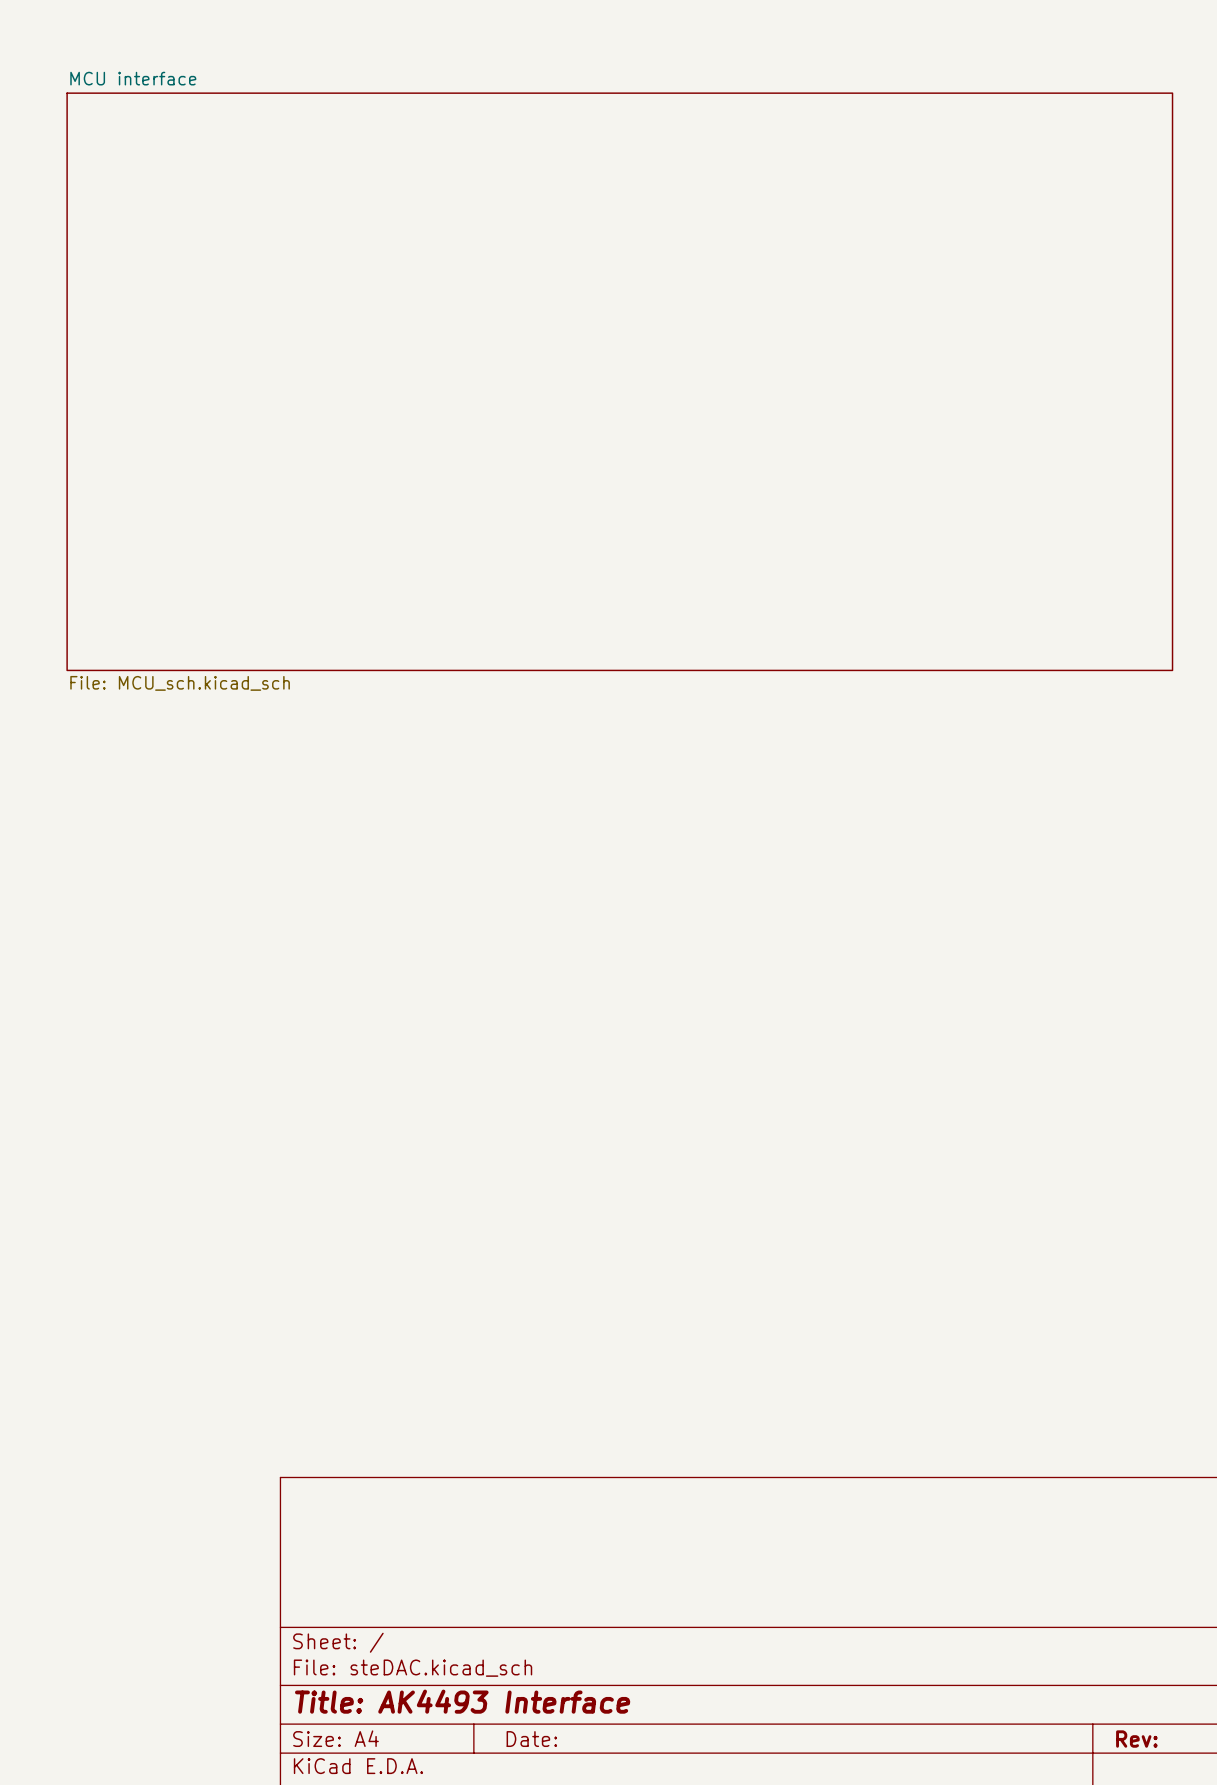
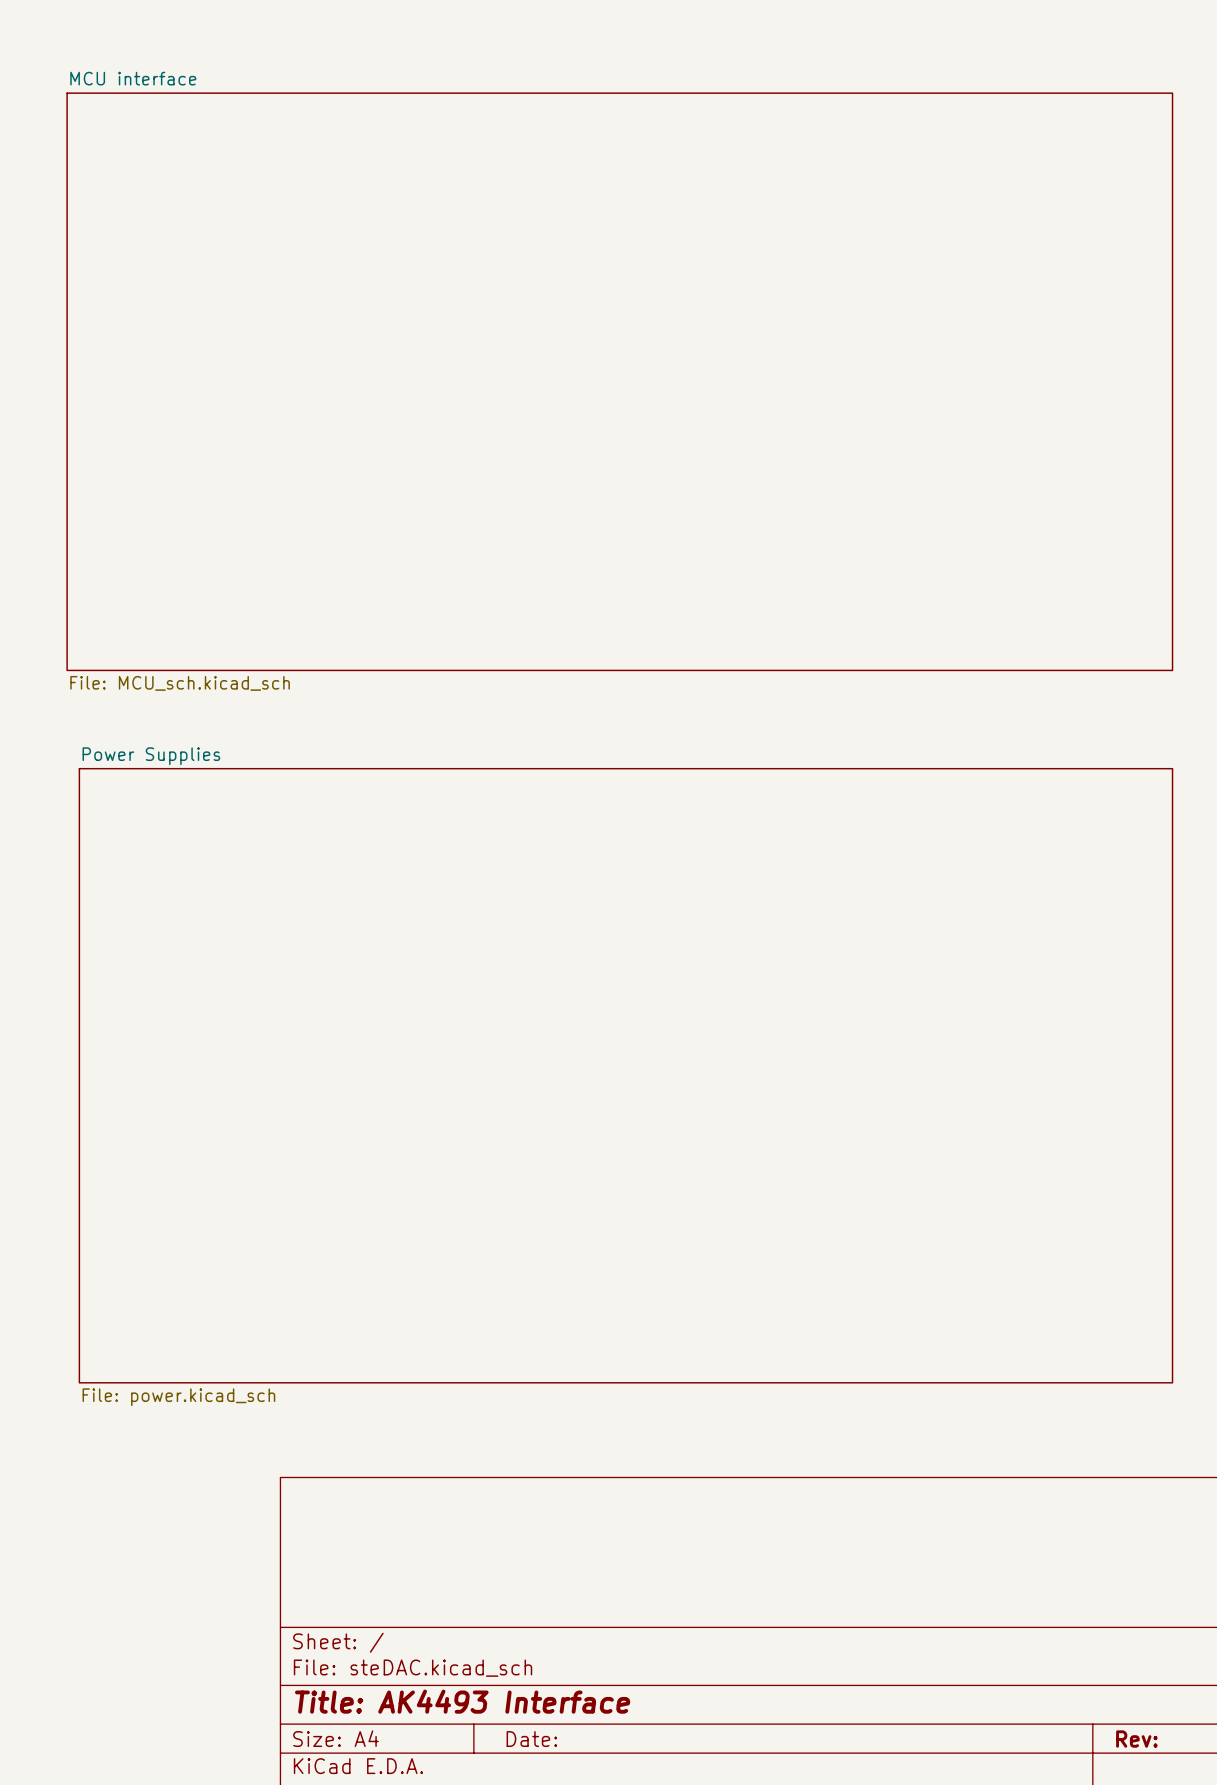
sheet Power Supplies: none -> File: power.kicad_sch (625, 1075)

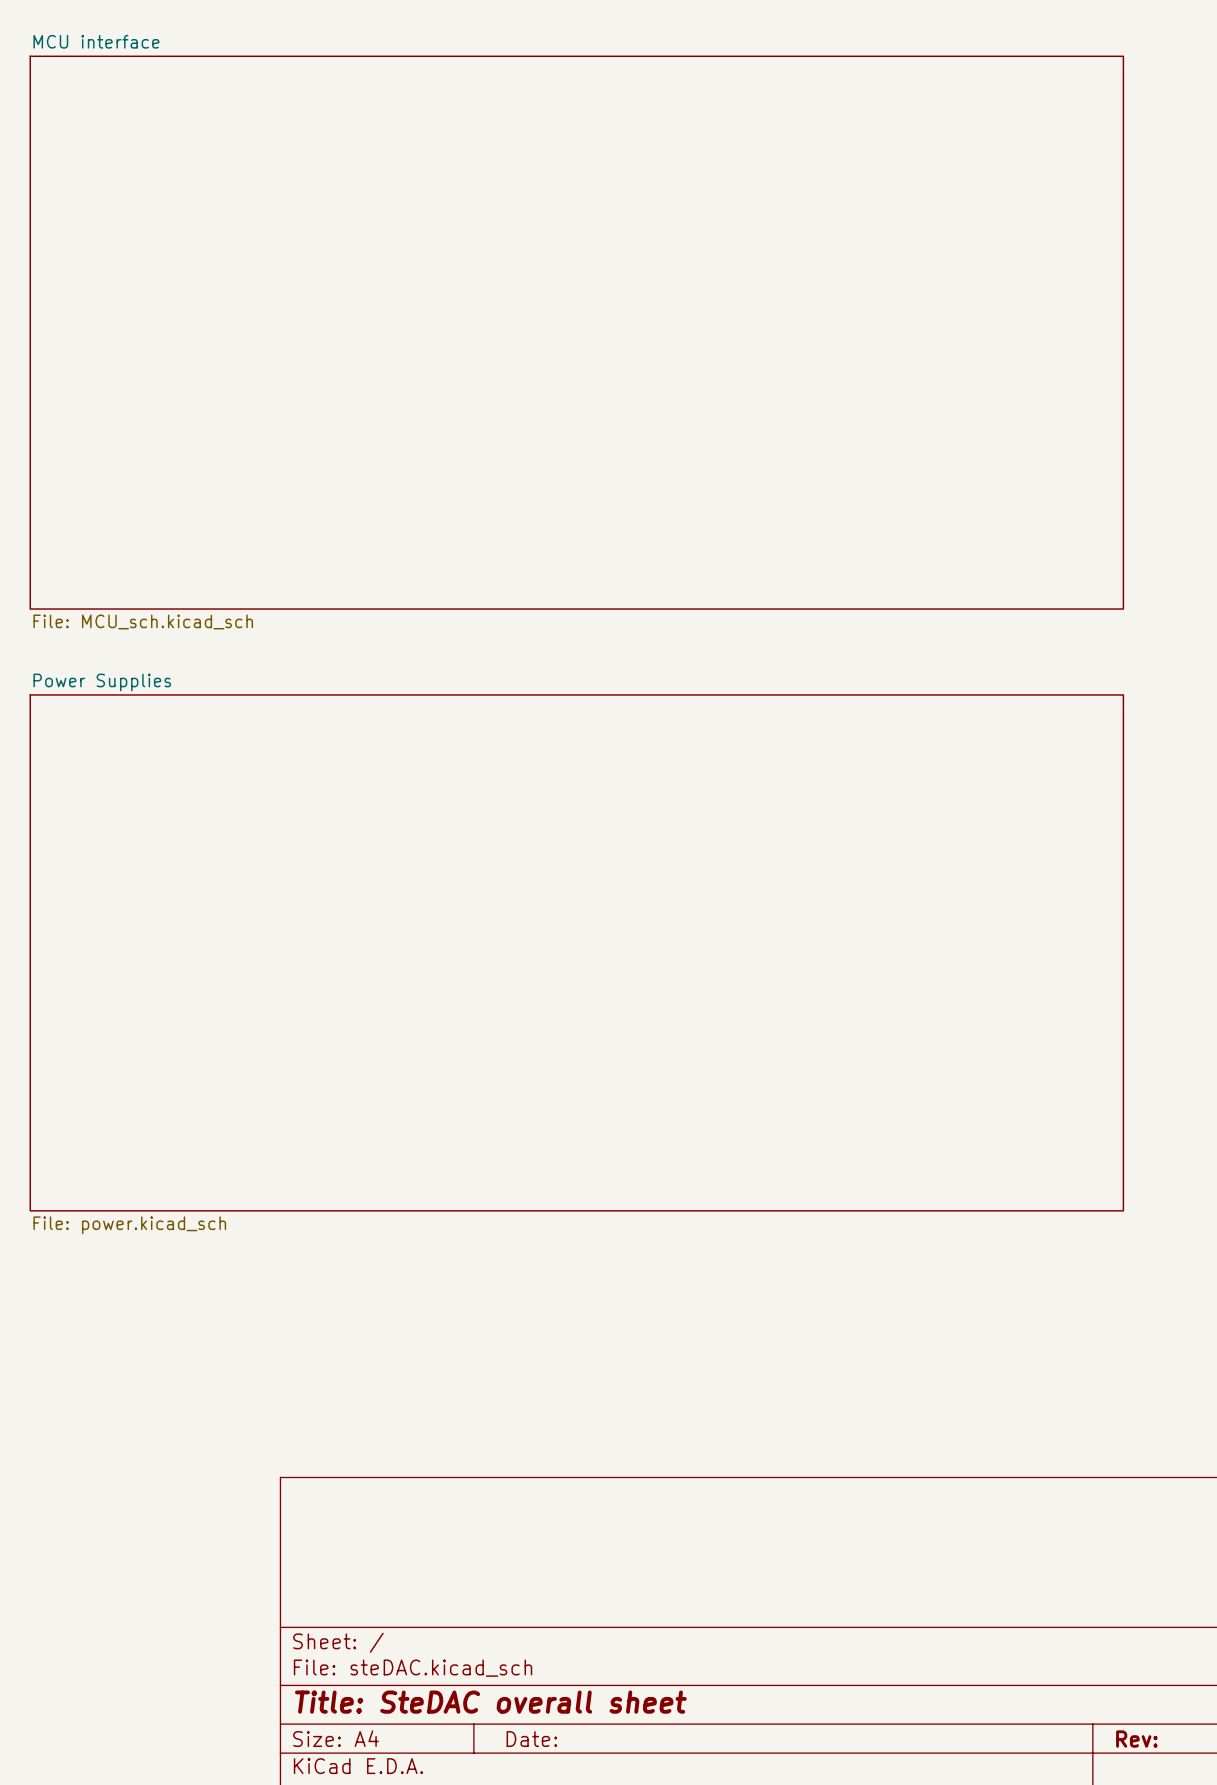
sheet MCU interface: none -> File: MCU_sch.kicad_sch (576, 332)
sheet MCU interface: File: MCU_sch.kicad_sch (619, 381) -> none
sheet Power Supplies: none -> File: power.kicad_sch (576, 952)
sheet Power Supplies: File: power.kicad_sch (625, 1075) -> none
title block: Title: AK4493 Interface (462, 1701) -> Title: SteDAC overall sheet (490, 1702)

